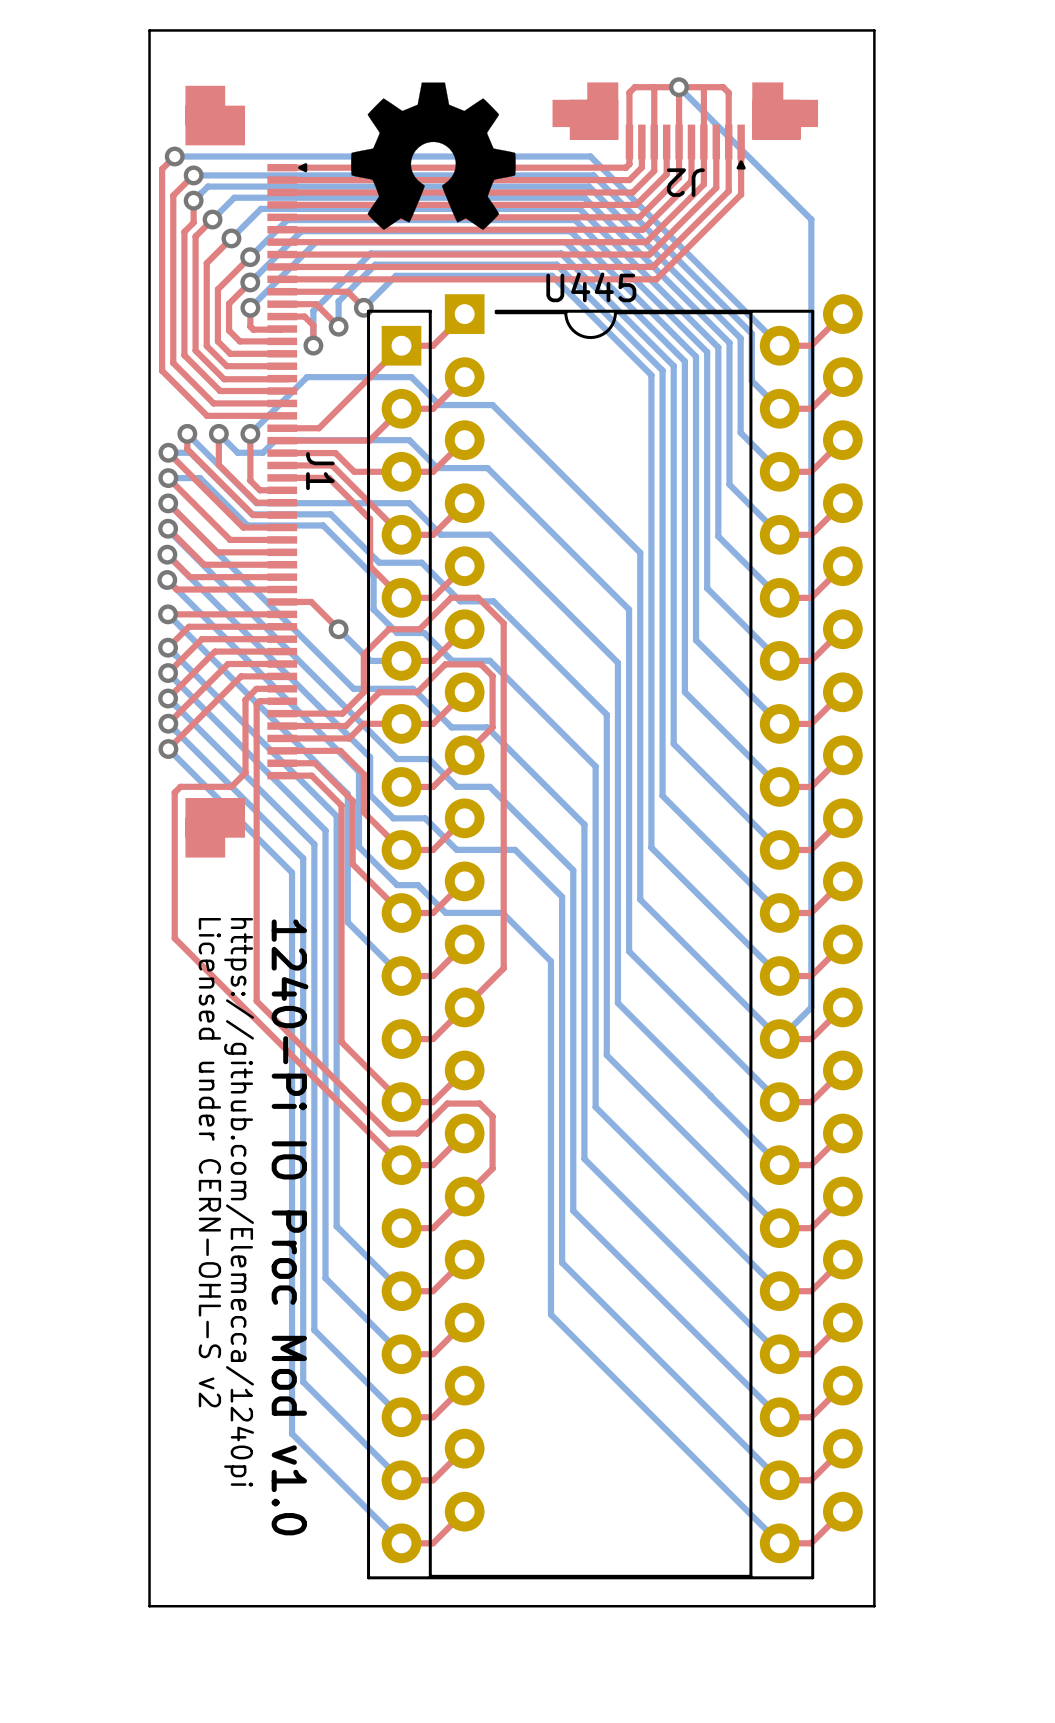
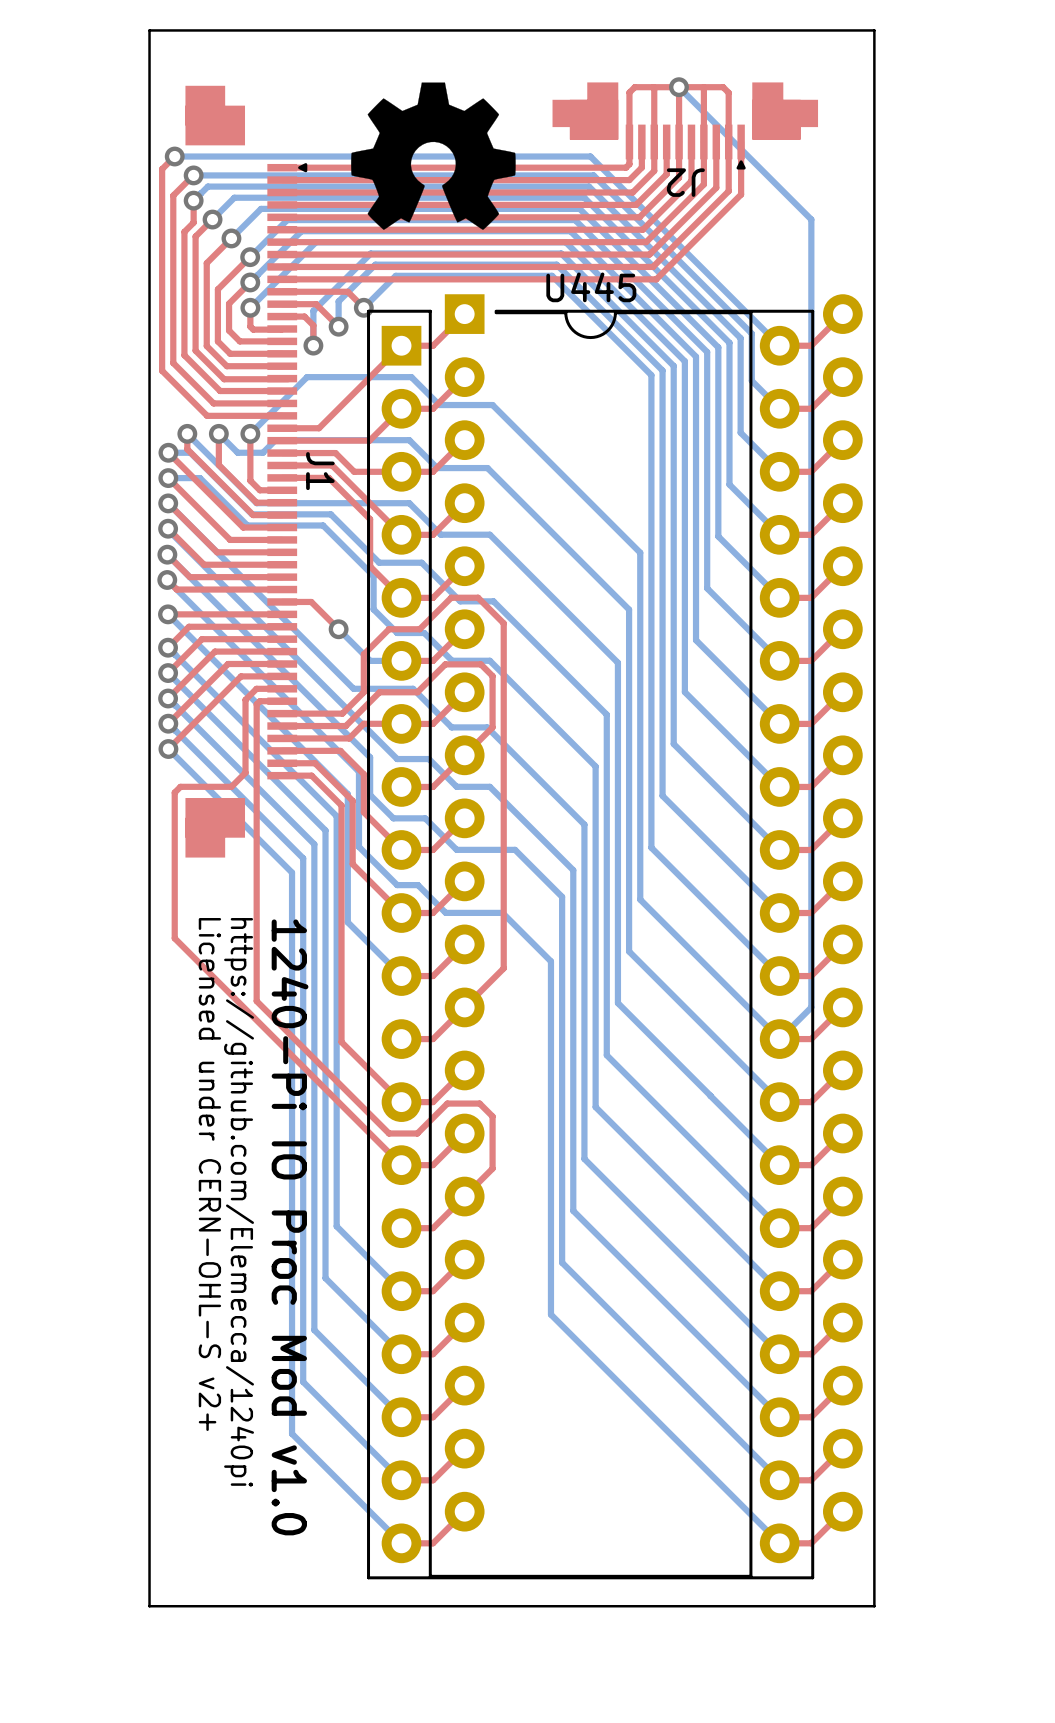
text: Licensed under CERN-OHL-S v2 (209, 1162) -> Licensed under CERN-OHL-S v2+ (209, 1174)

